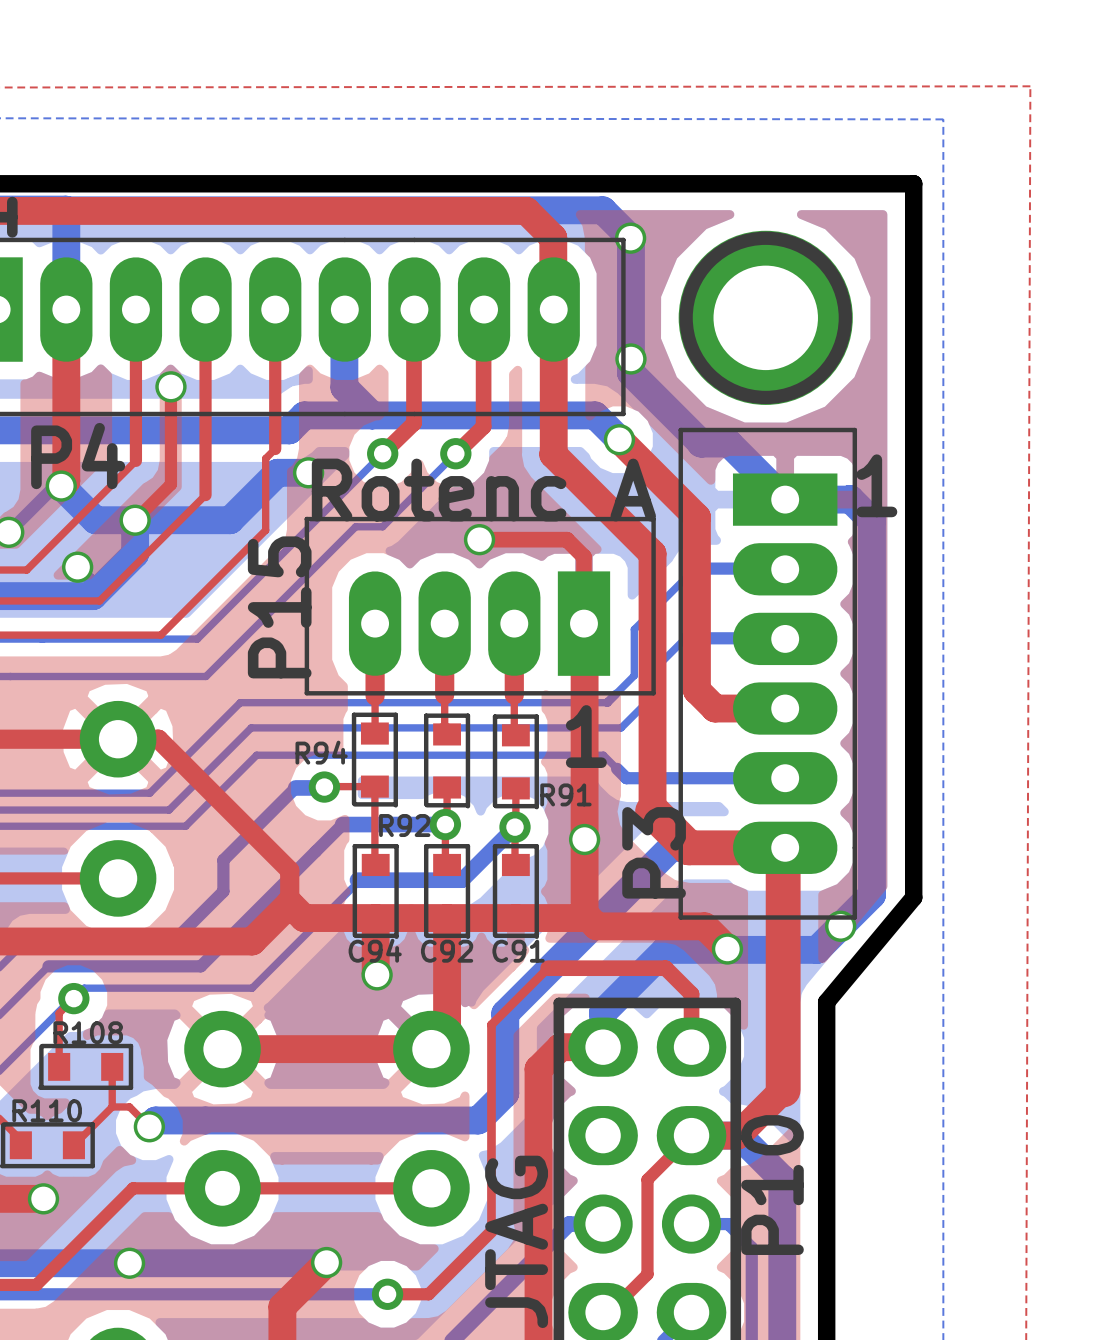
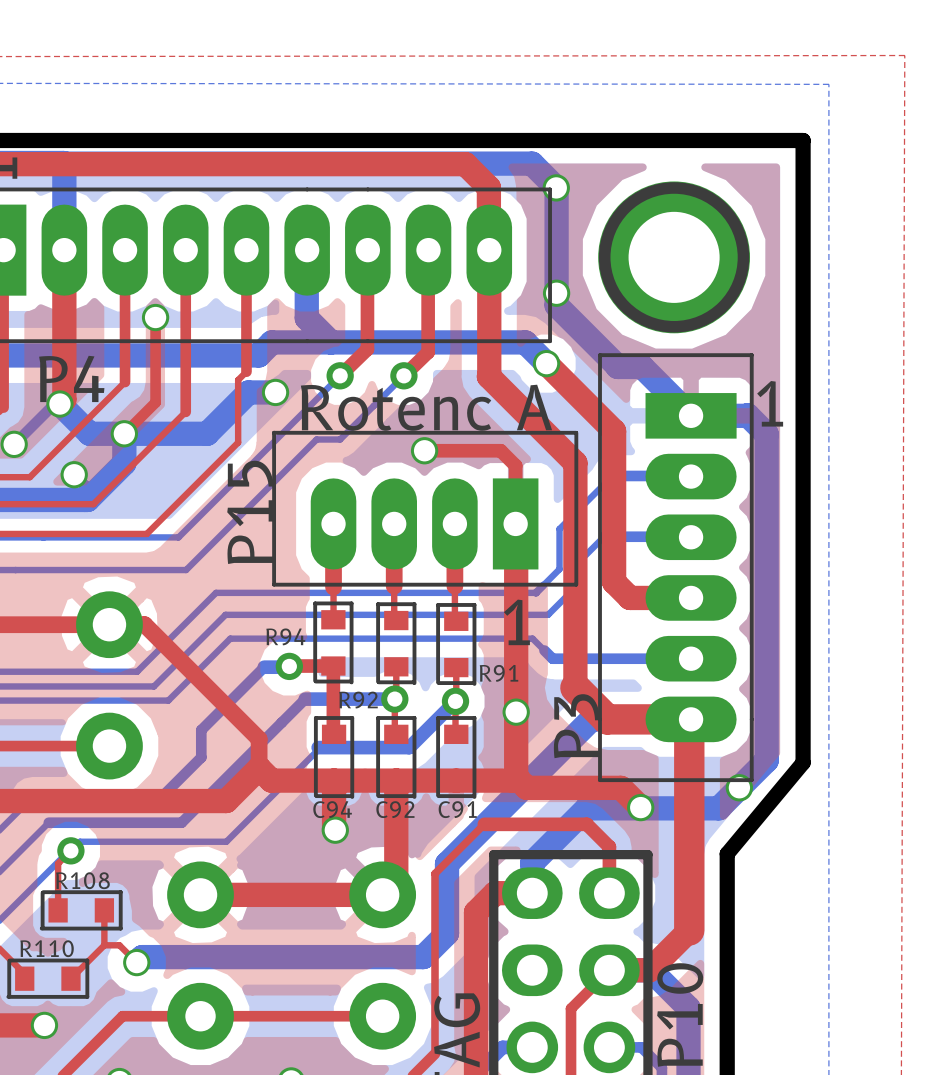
top track width: thin (324, 786) (374, 786) (374, 864) -> thick (289, 666) (333, 666) (333, 733)

